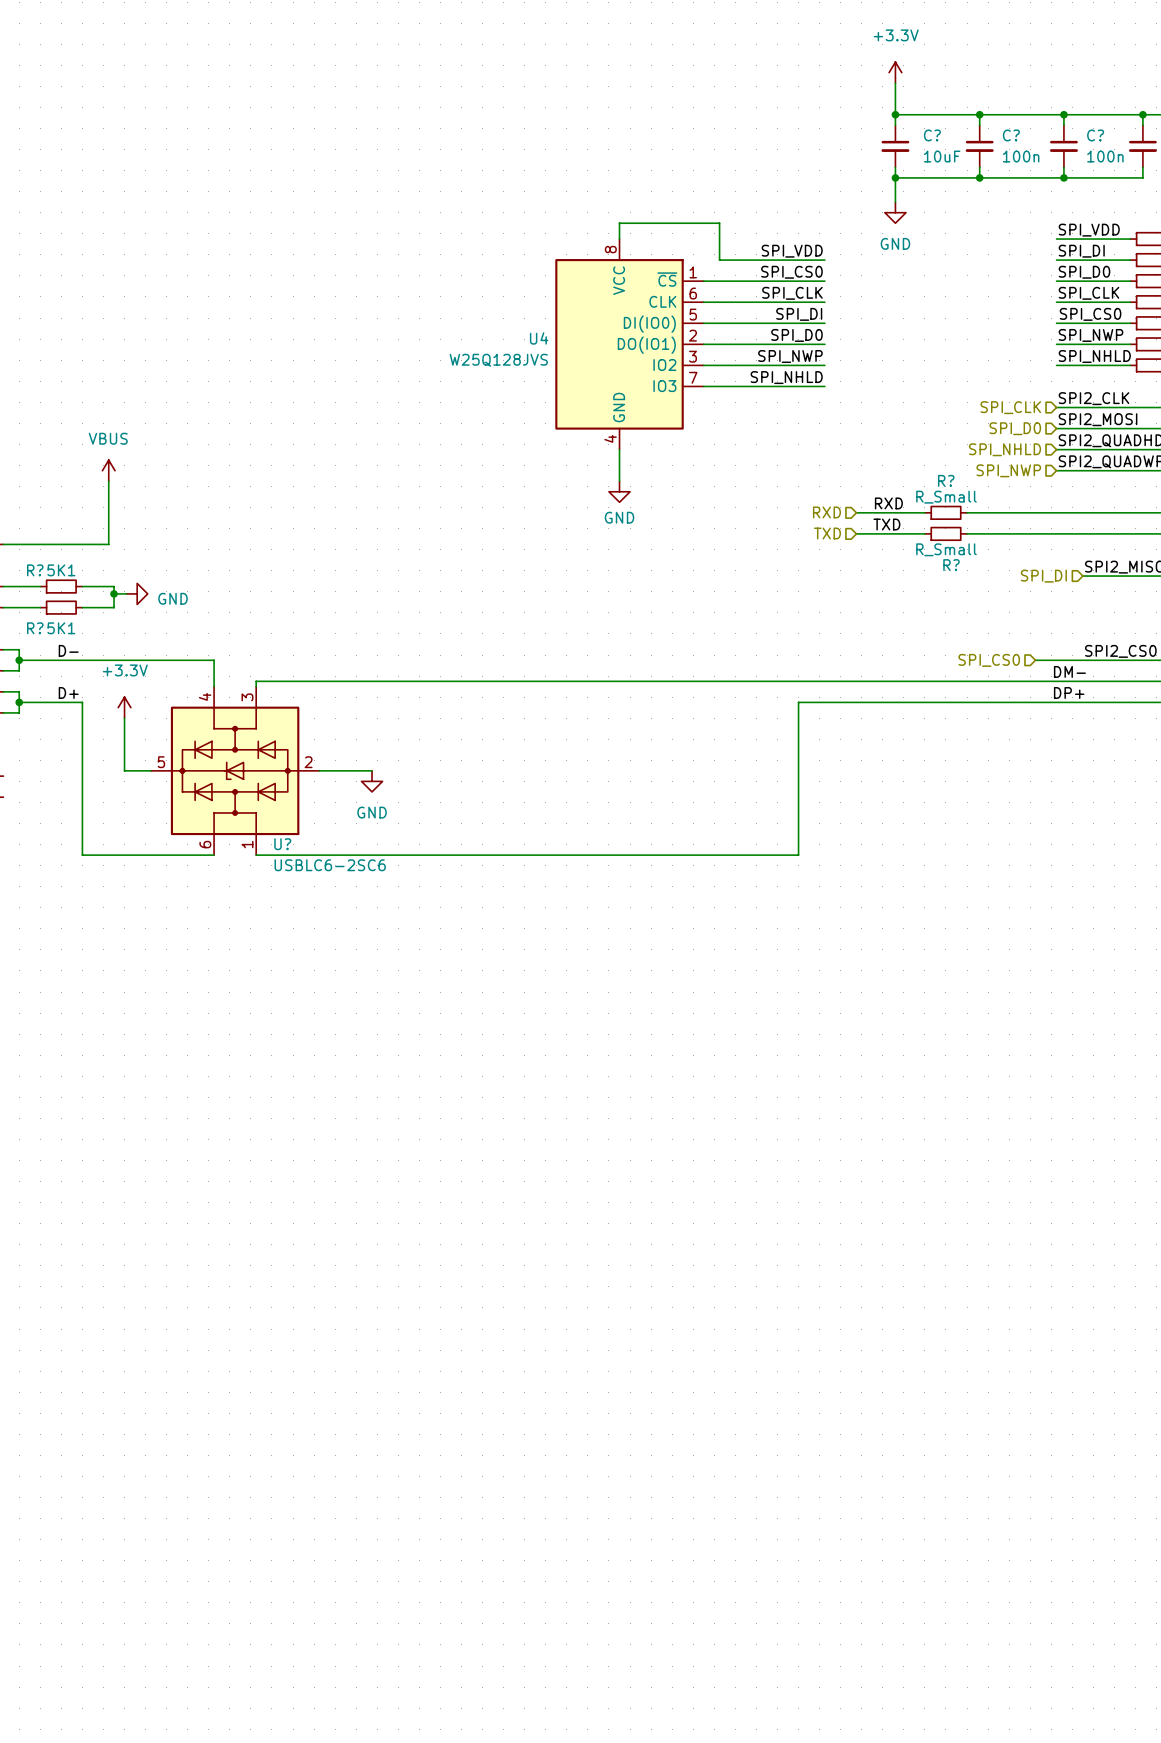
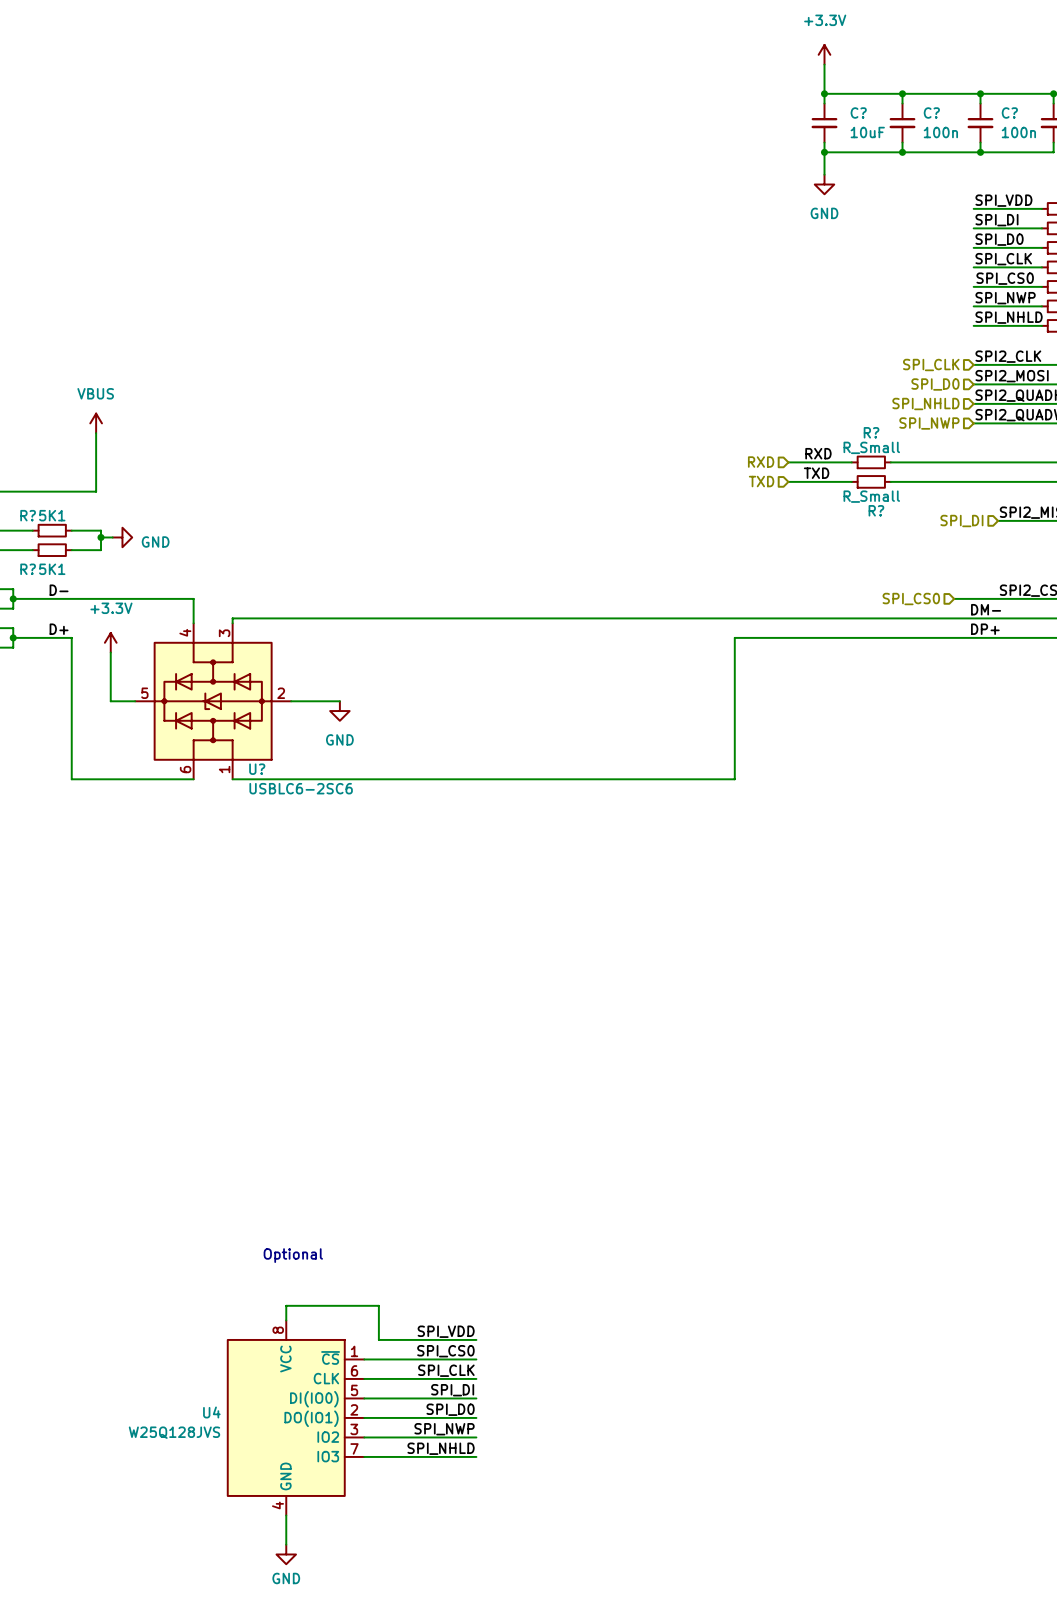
wire: (619, 239) (619, 223) (719, 223) (719, 260) (824, 260) -> none
label: SPI_VDD (792, 251) -> none
label: SPI_CS0 (791, 272) -> none
wire: (703, 281) (824, 281) -> none
label: SPI_CLK (792, 293) -> none
wire: (703, 302) (824, 302) -> none
label: SPI_DI (799, 314) -> none
wire: (703, 323) (824, 323) -> none
label: SPI_D0 (796, 335) -> none
U4 position: (629, 344) -> (295, 1417)
wire: (703, 344) (824, 344) -> none
label: SPI_NWP (790, 356) -> none
wire: (703, 365) (824, 365) -> none
label: SPI_NHLD (786, 377) -> none
wire: (703, 386) (824, 386) -> none
wire: (619, 449) (619, 481) -> none
power symbol: GND (619, 491) -> none
text: none -> Optional (293, 1255)
wire: none -> (286, 1320) (286, 1305) (378, 1305) (378, 1339) (476, 1339)
label: none -> SPI_VDD (446, 1331)
label: none -> SPI_CS0 (445, 1351)
wire: none -> (364, 1359) (476, 1359)
label: none -> SPI_CLK (446, 1370)
wire: none -> (364, 1378) (476, 1378)
label: none -> SPI_DI (452, 1390)
wire: none -> (364, 1398) (476, 1398)
label: none -> SPI_D0 (450, 1409)
wire: none -> (364, 1417) (476, 1417)
label: none -> SPI_NWP (444, 1429)
wire: none -> (364, 1437) (476, 1437)
label: none -> SPI_NHLD (441, 1448)
wire: none -> (364, 1456) (476, 1456)
wire: none -> (286, 1515) (286, 1544)
power symbol: none -> GND (286, 1554)

